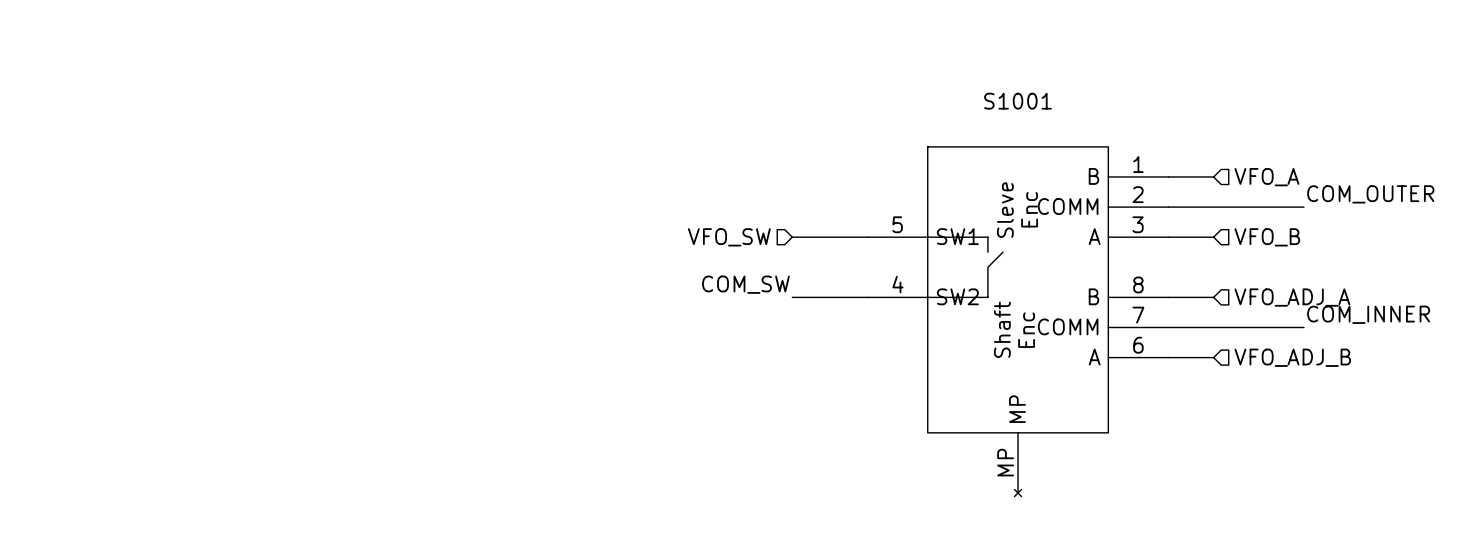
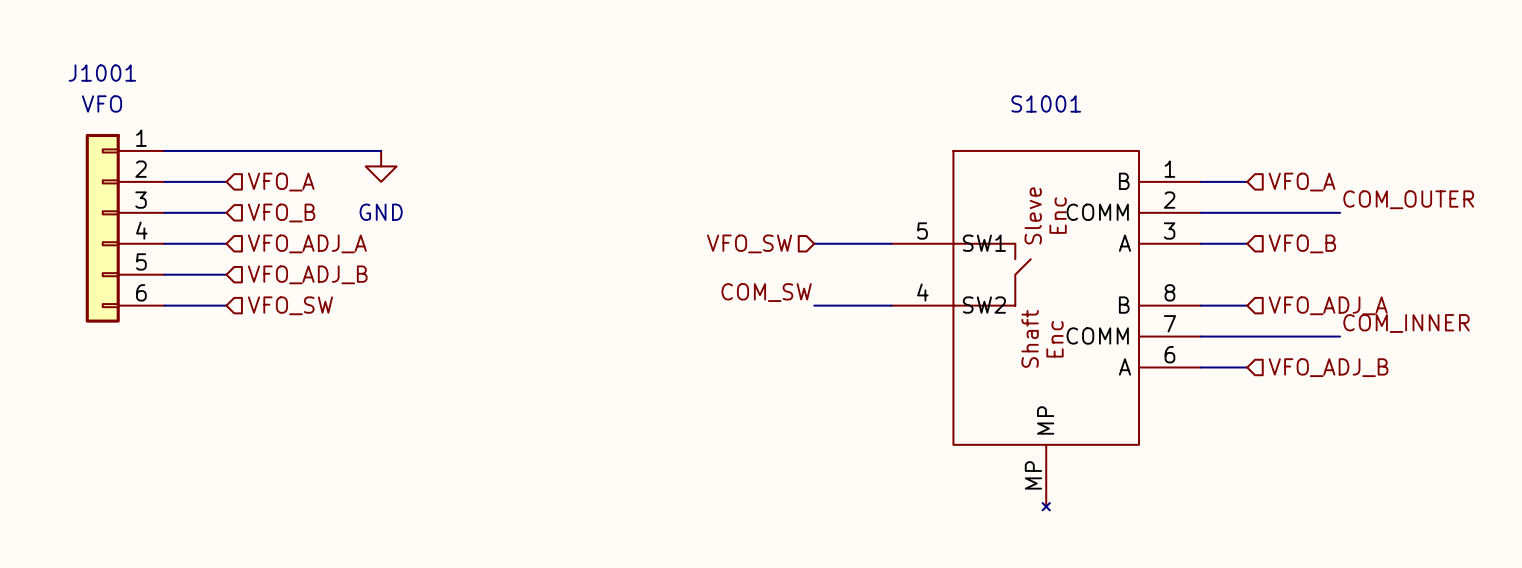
wire: none -> (164, 150) (381, 150)
power symbol: none -> GND (381, 166)
wire: none -> (164, 181) (226, 181)
hierarchical label: none -> VFO_A (281, 182)
wire: none -> (164, 212) (226, 212)
hierarchical label: none -> VFO_B (281, 212)
J1001: none -> VFO (125, 228)
wire: none -> (164, 243) (226, 243)
hierarchical label: none -> VFO_ADJ_A (307, 243)
wire: none -> (164, 274) (226, 274)
hierarchical label: none -> VFO_ADJ_B (307, 274)
wire: none -> (164, 305) (226, 305)
hierarchical label: none -> VFO_SW (290, 305)

